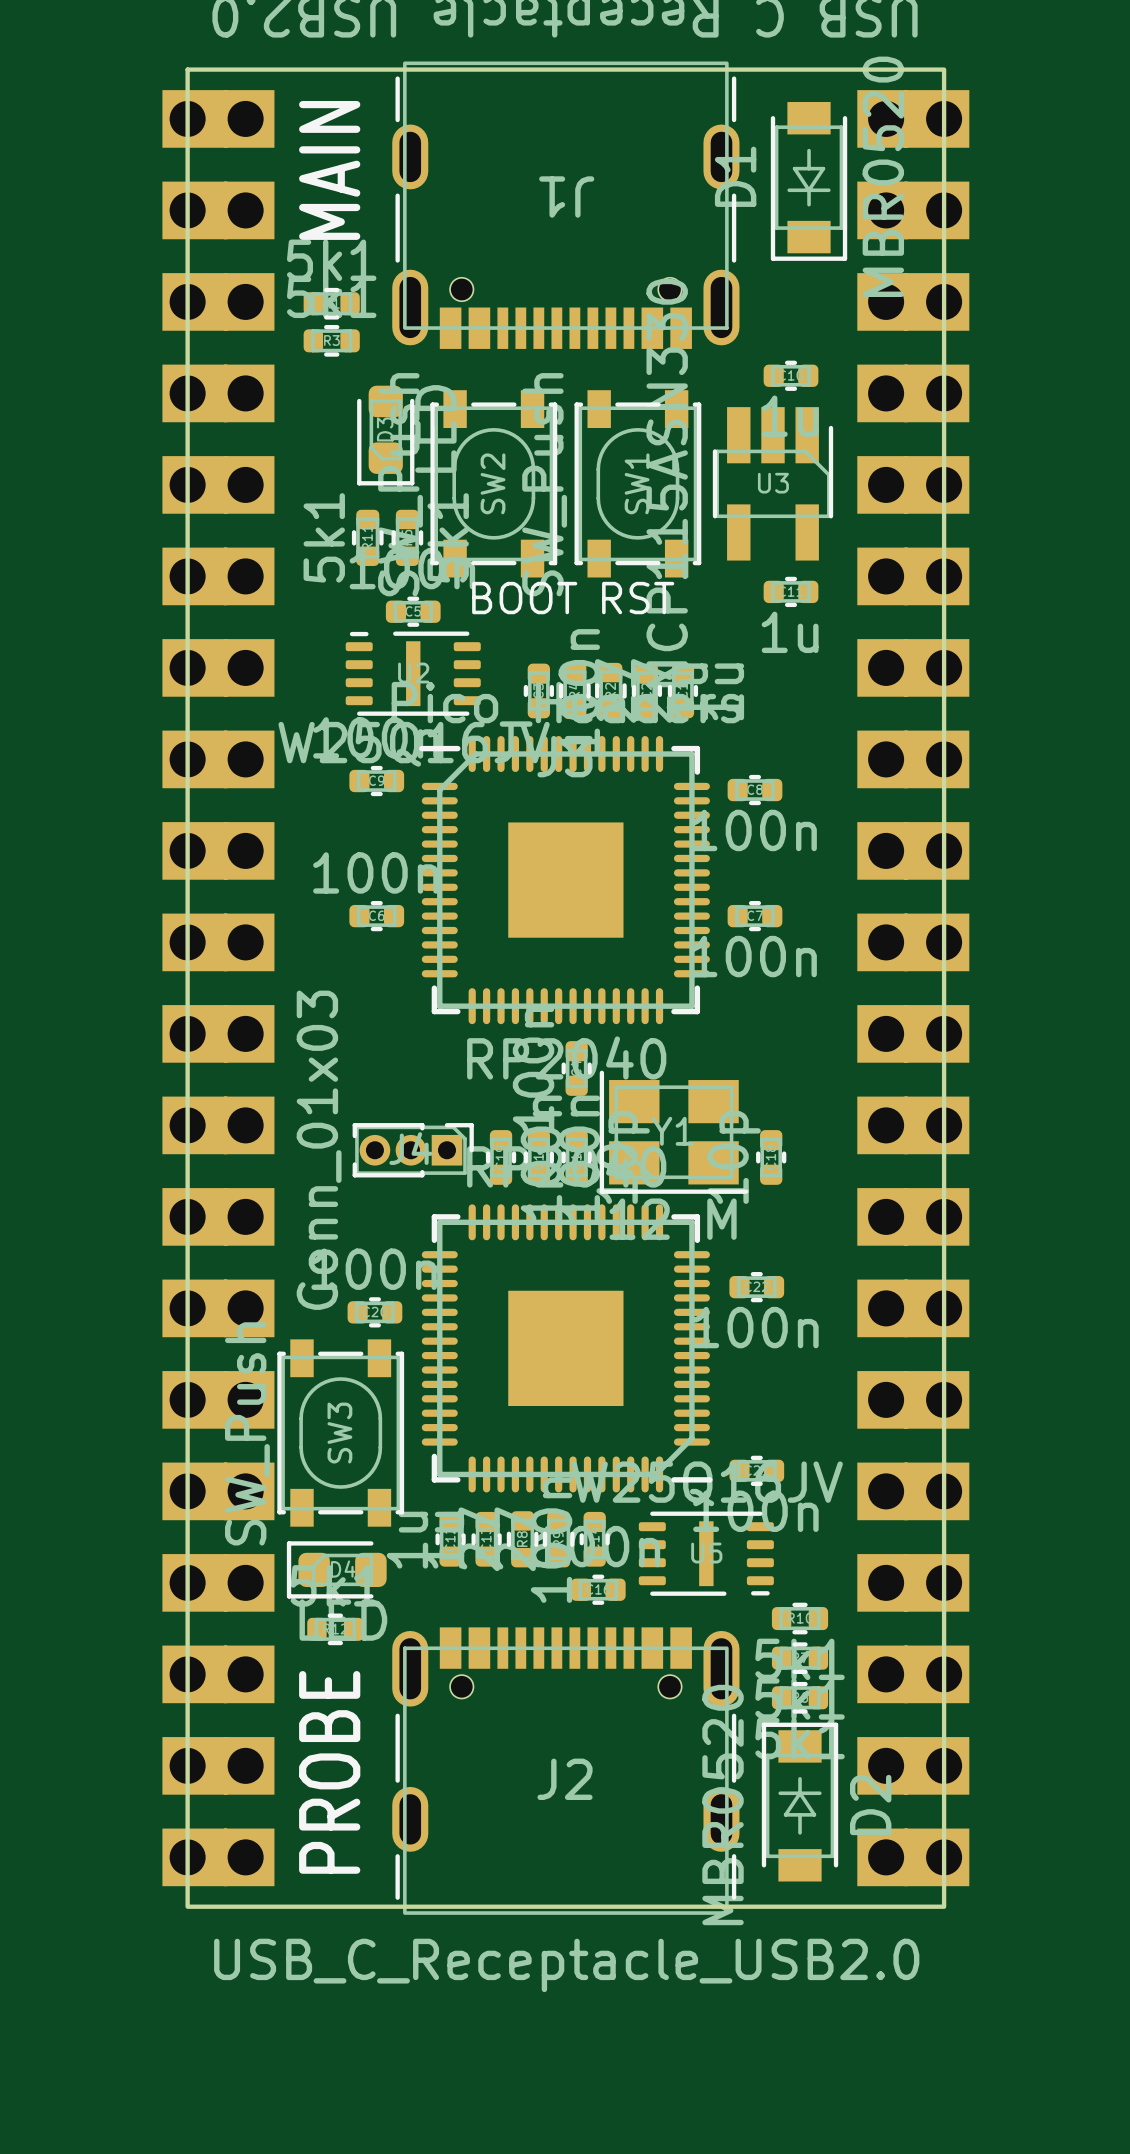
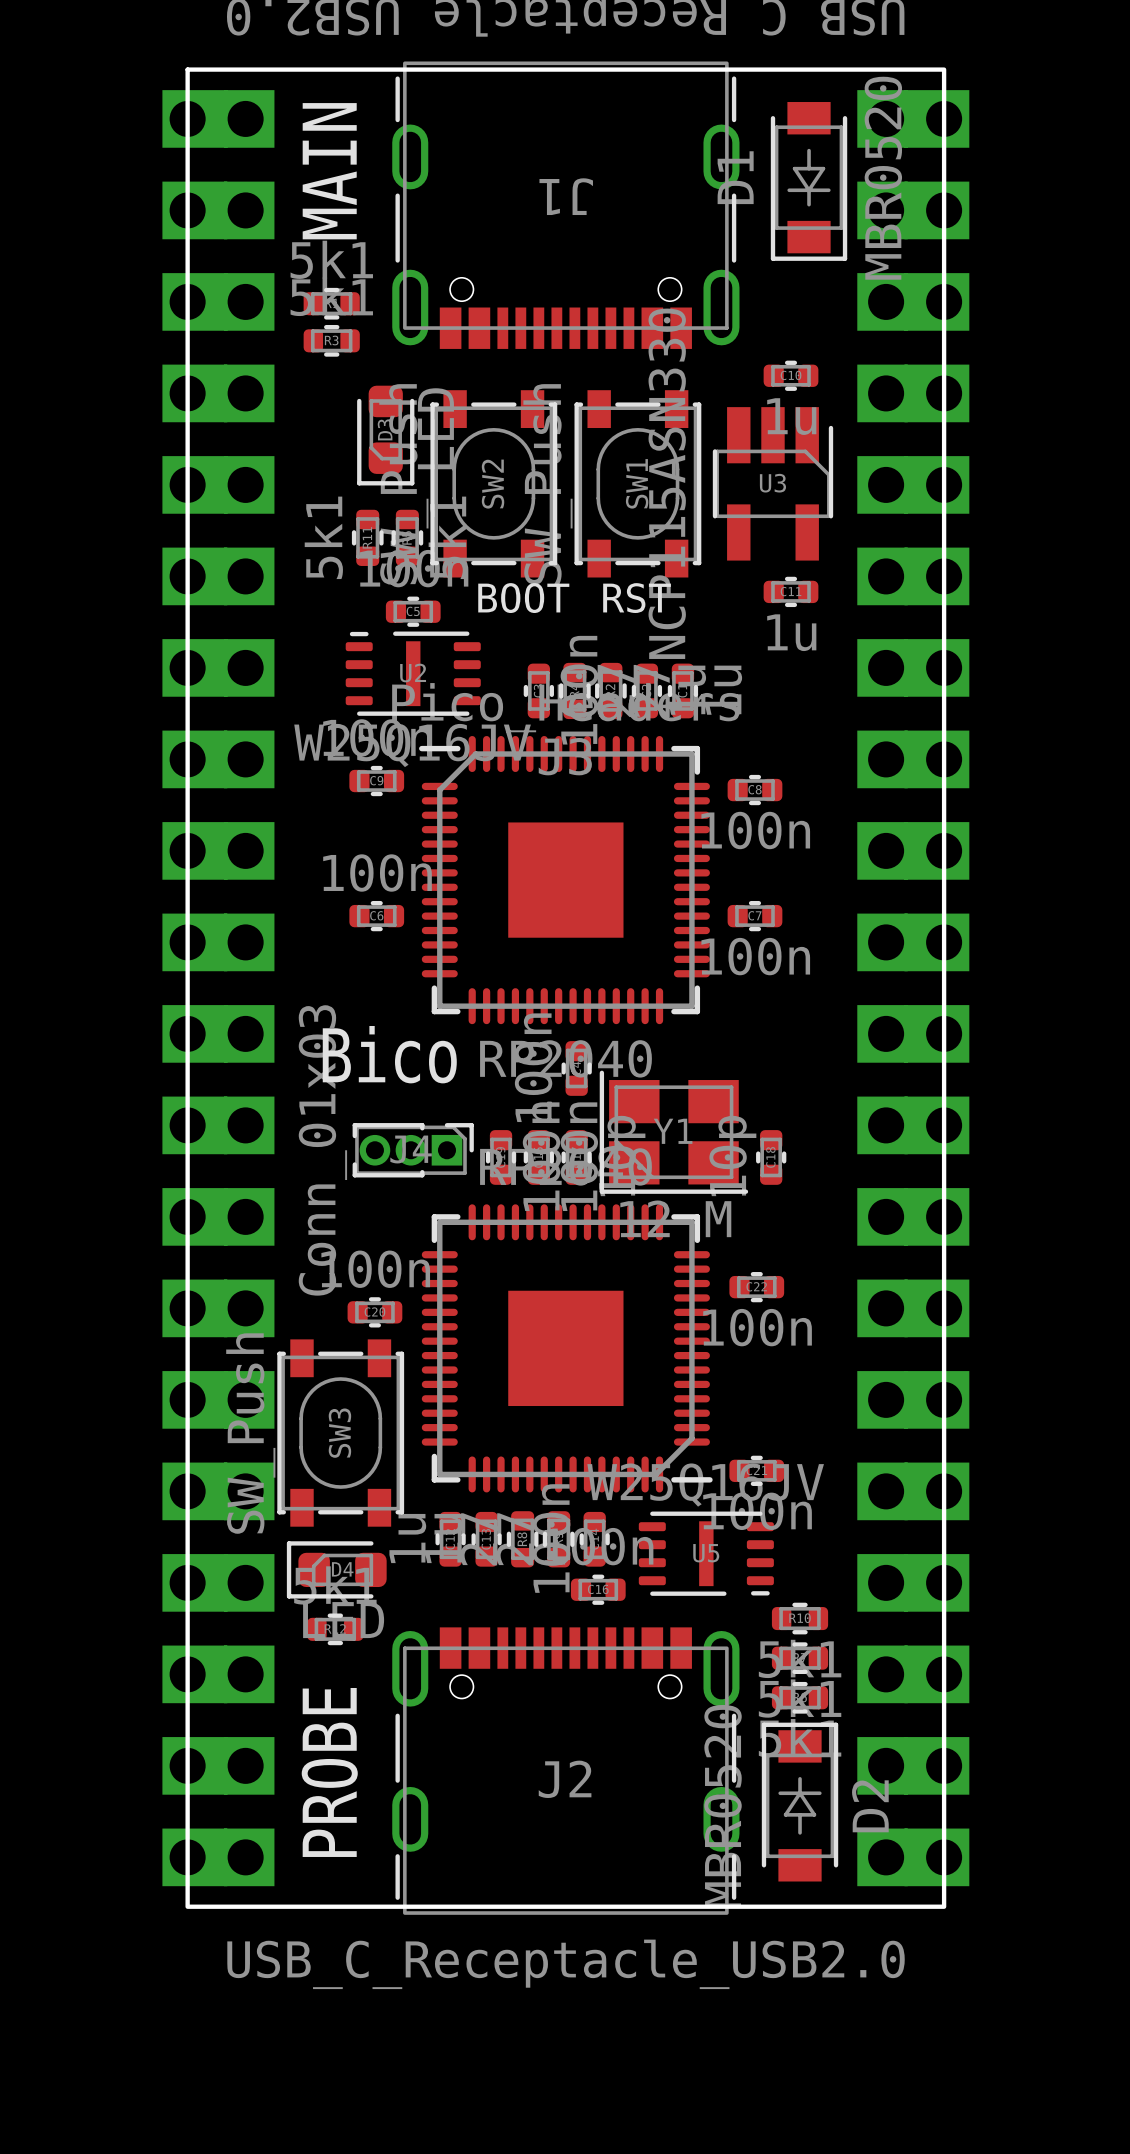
text: none -> Bico (389, 1054)

